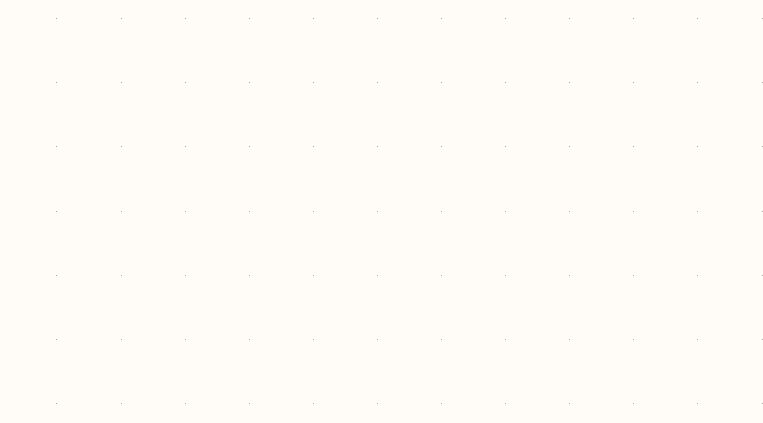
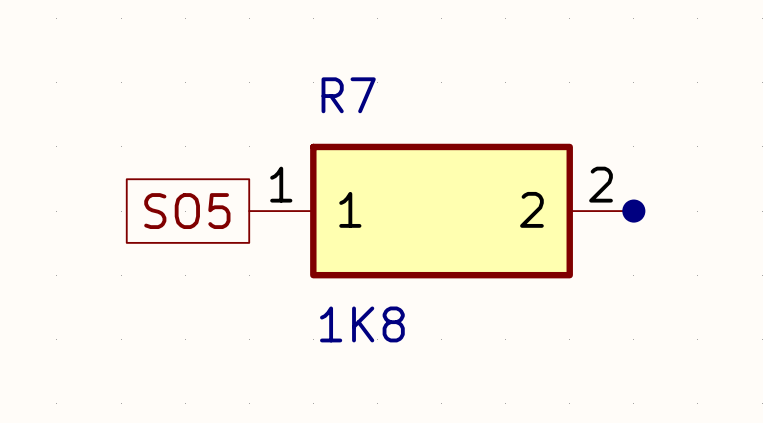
global label: none -> SO5 (187, 211)
R7: none -> 1K8 (441, 211)
junction: none -> (633, 211)

